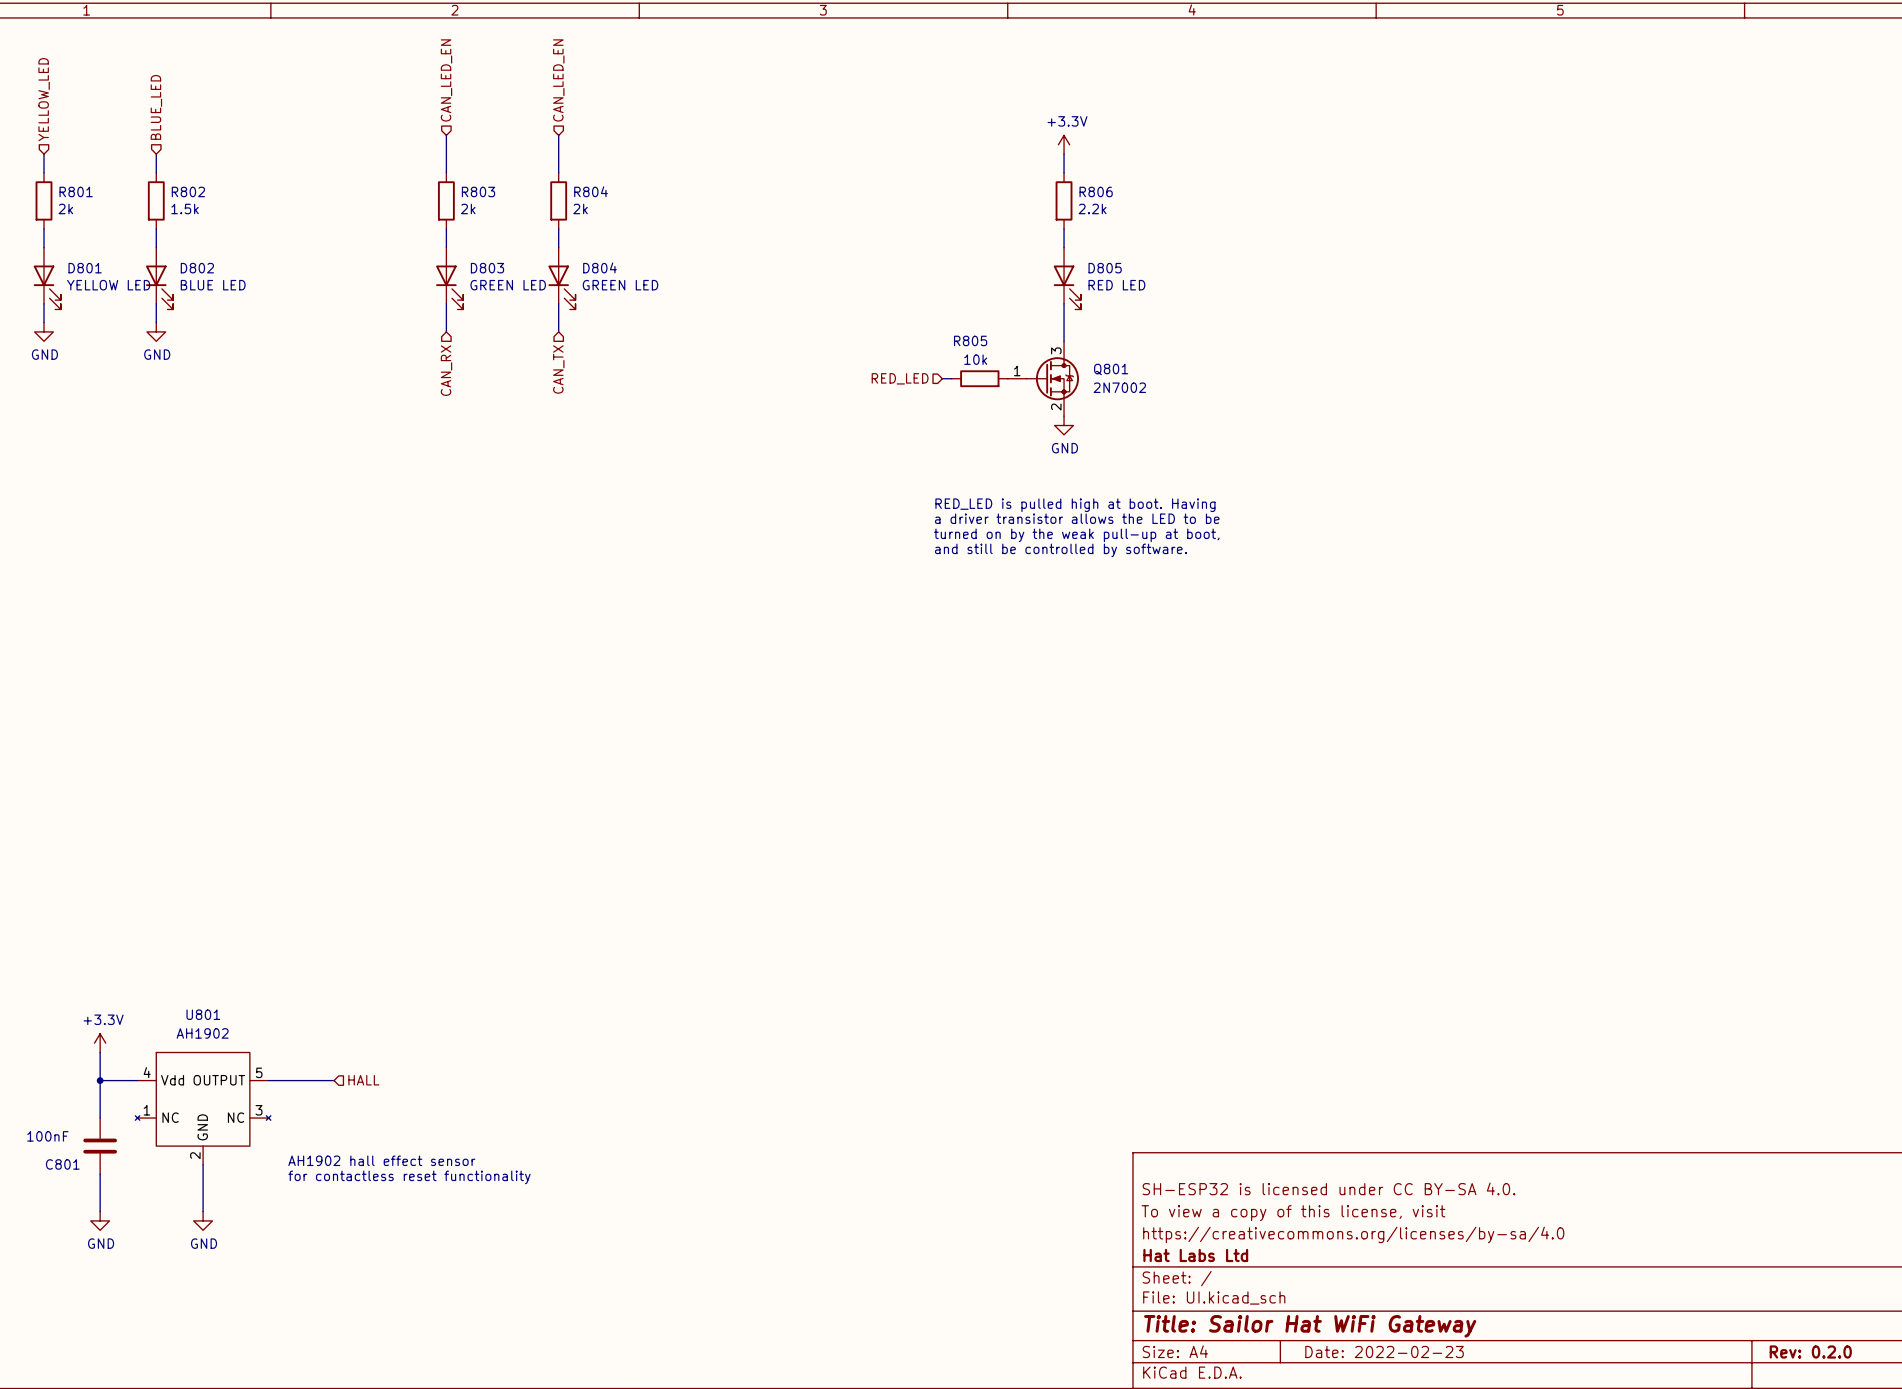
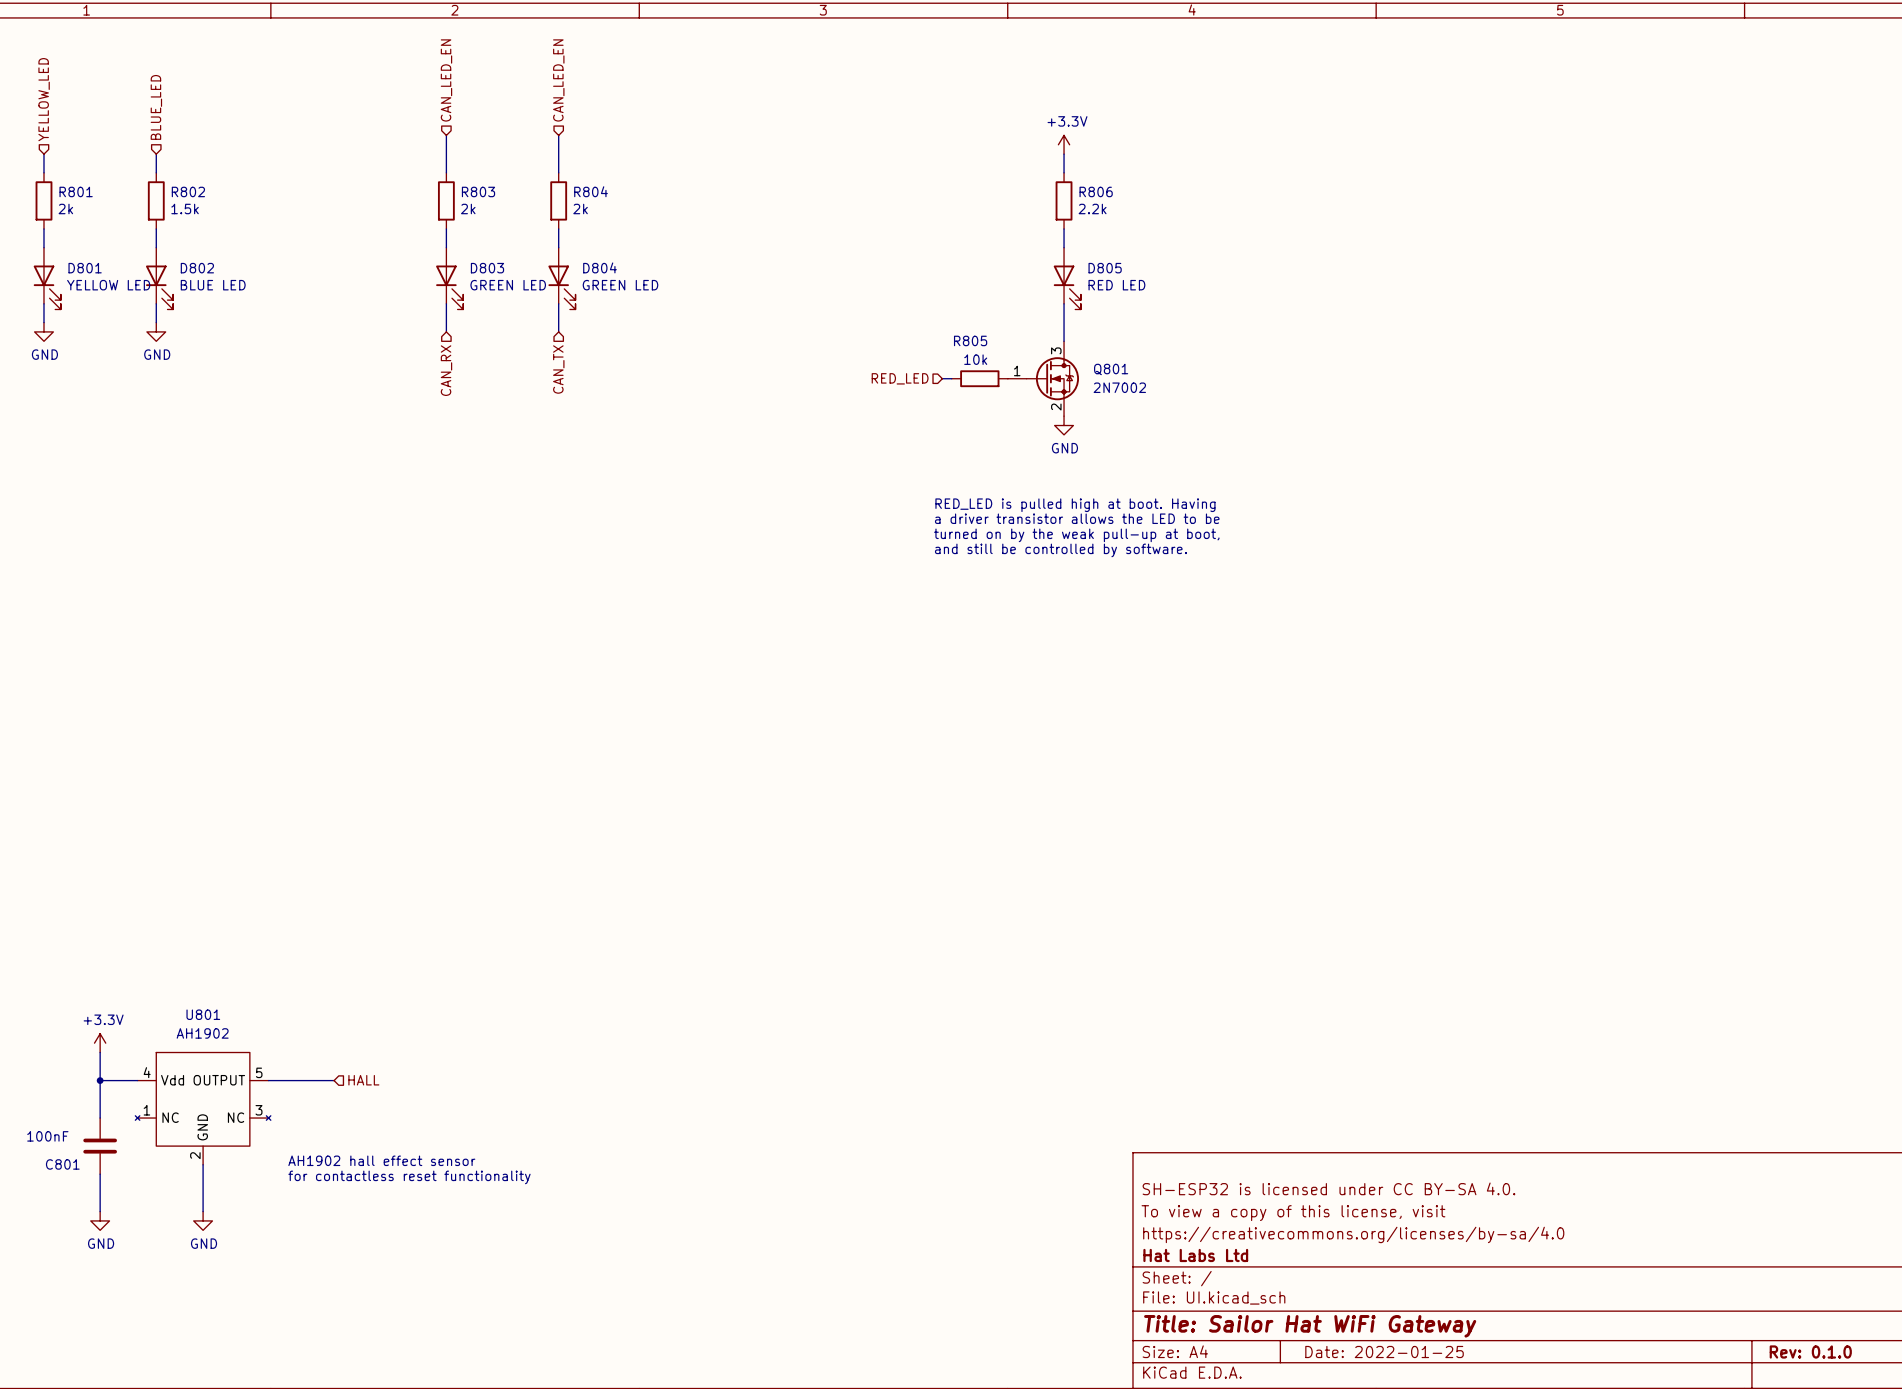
title block: Date: 2022-02-23 (1384, 1352) -> Date: 2022-01-25 (1384, 1352)
title block: Rev: 0.2.0 (1810, 1352) -> Rev: 0.1.0 (1810, 1352)

